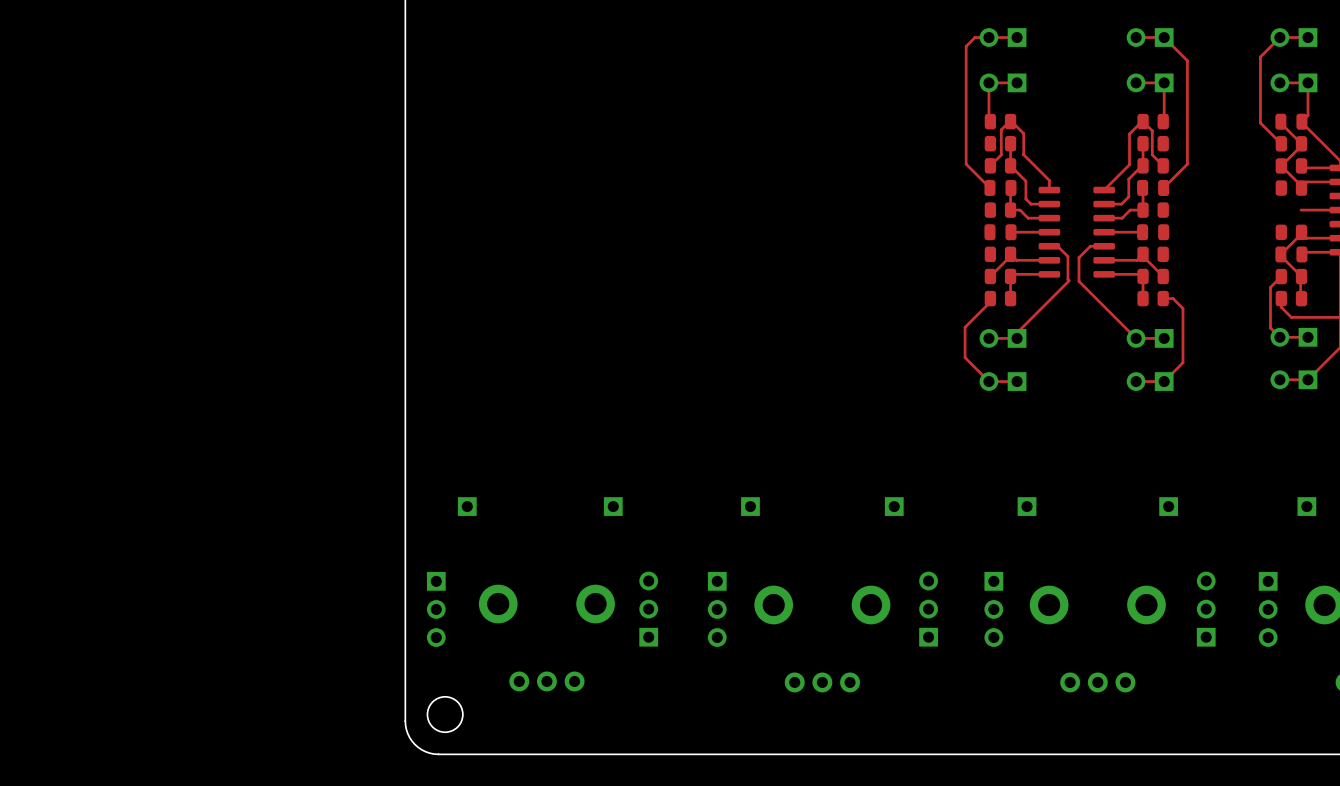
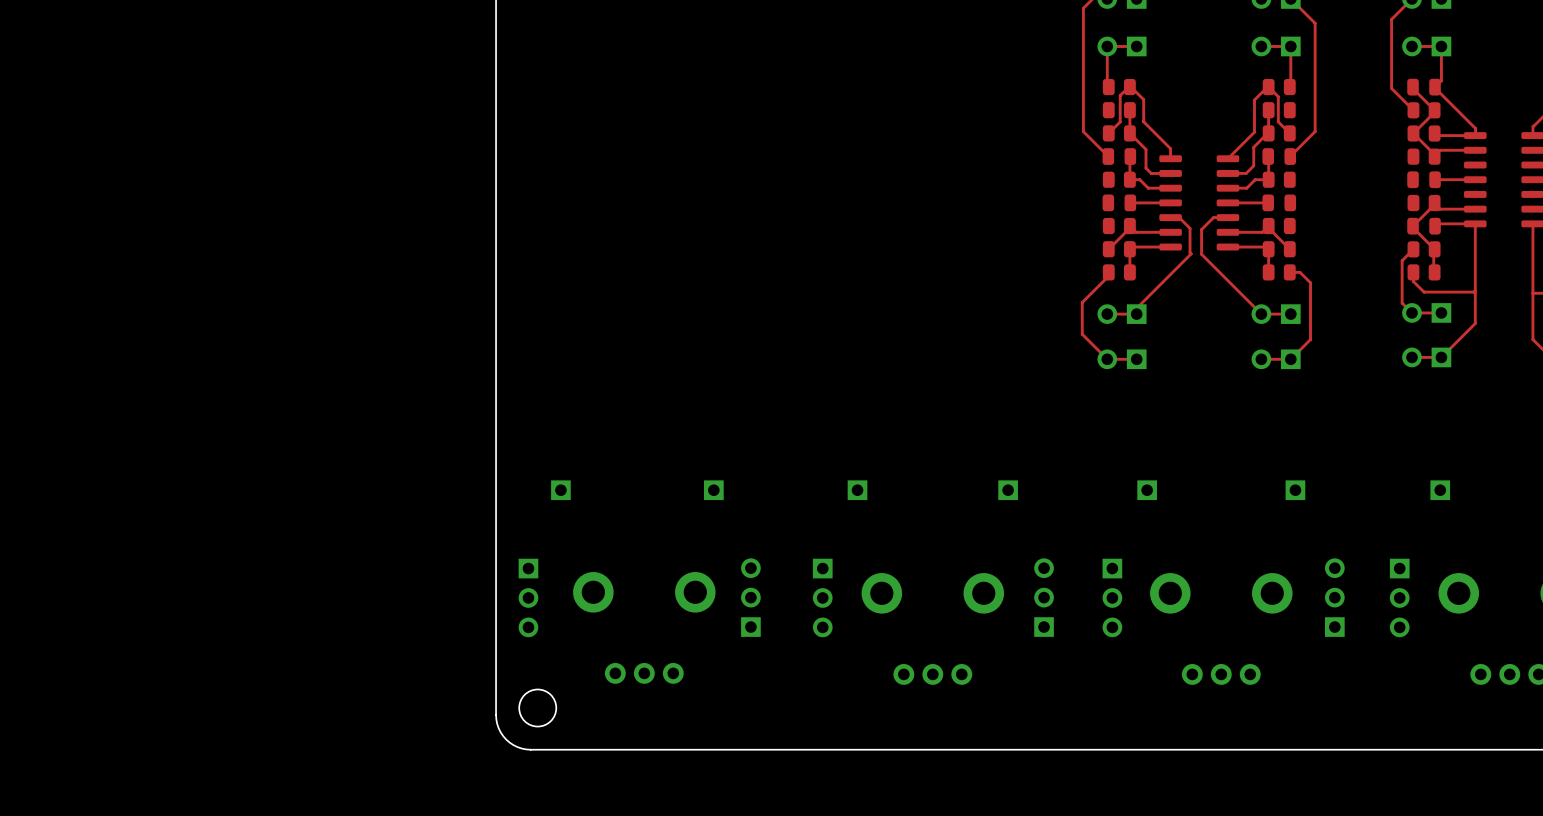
part: none -> (1424, 179)

